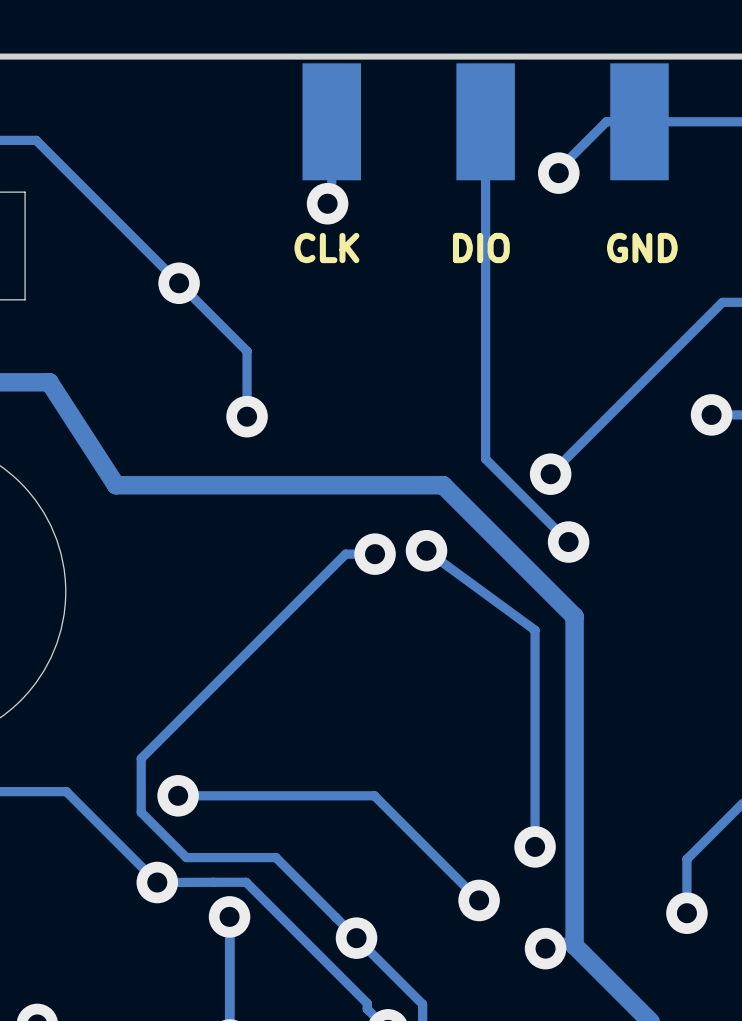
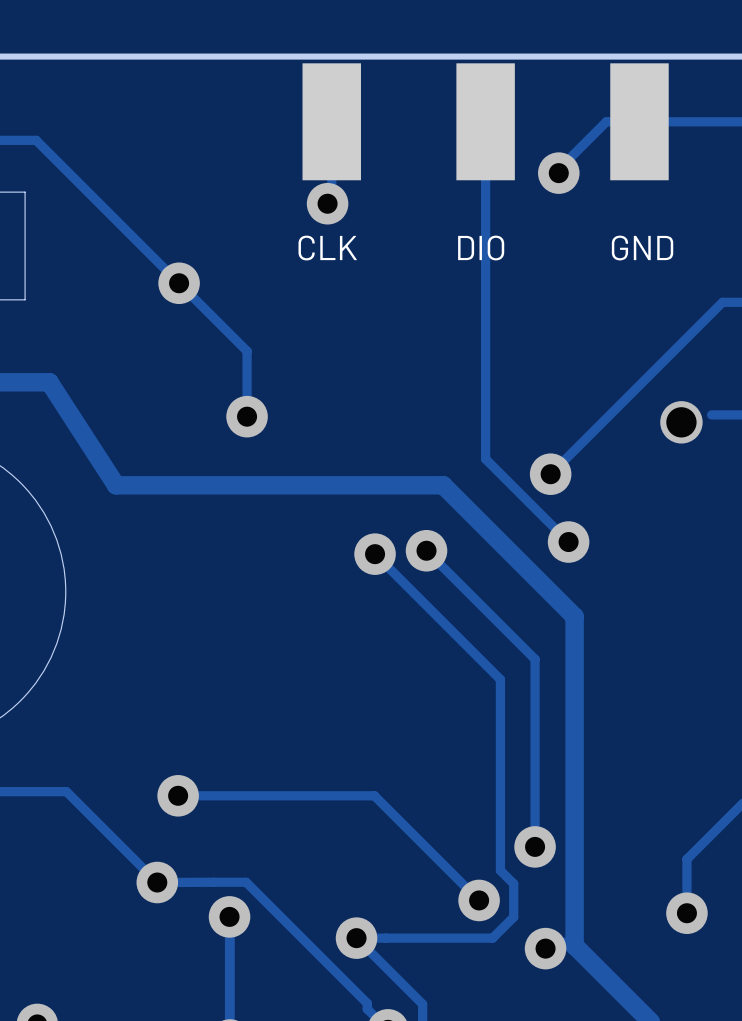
via position: (711, 414) -> (681, 422)
track: (426, 550) (535, 630) (535, 659) -> (426, 550) (535, 659)
track: (375, 554) (345, 554) (141, 758) (141, 812) (186, 857) (275, 857) (356, 938) -> (375, 554) (500, 679) (500, 870) (513, 883) (513, 917) (492, 938) (356, 938)

